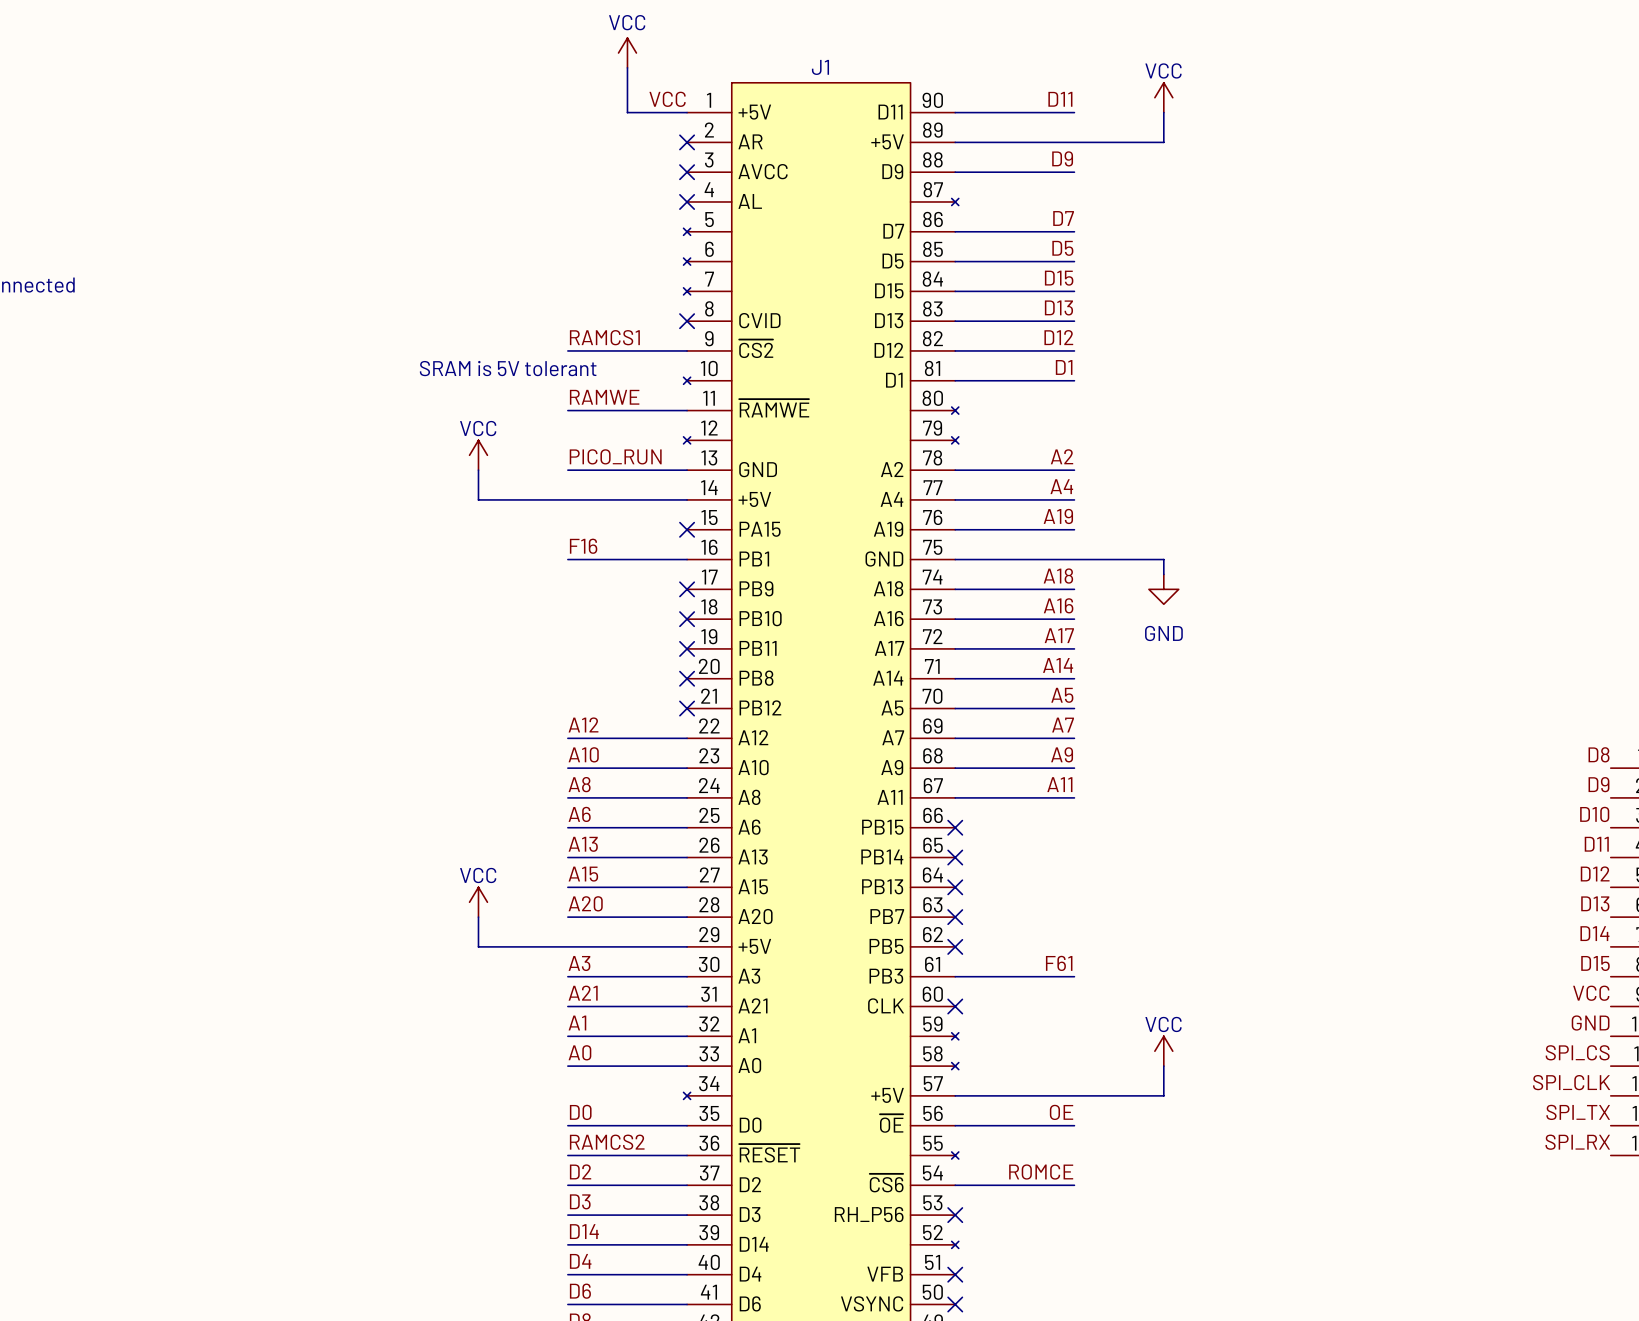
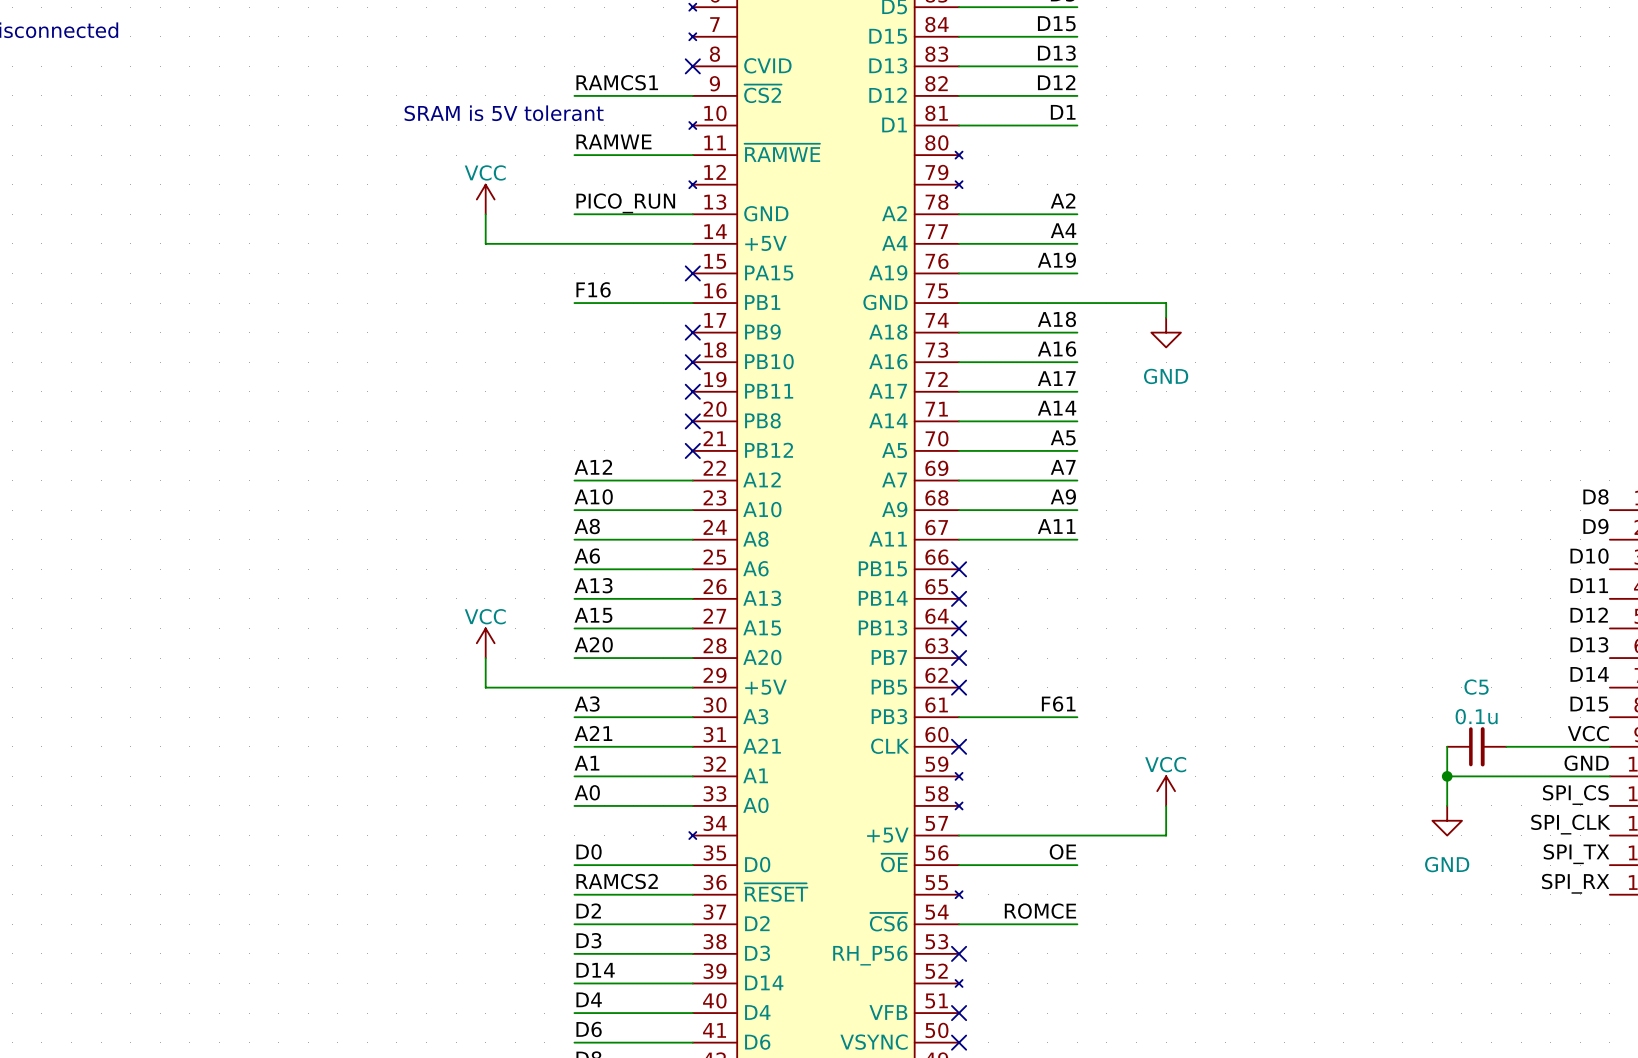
wire: none -> (1447, 746) (1447, 805)
C5: none -> 0.1u (1476, 746)
wire: none -> (1506, 746) (1609, 746)
wire: none -> (1447, 776) (1609, 776)
junction: none -> (1447, 776)
power symbol: none -> GND (1447, 820)

